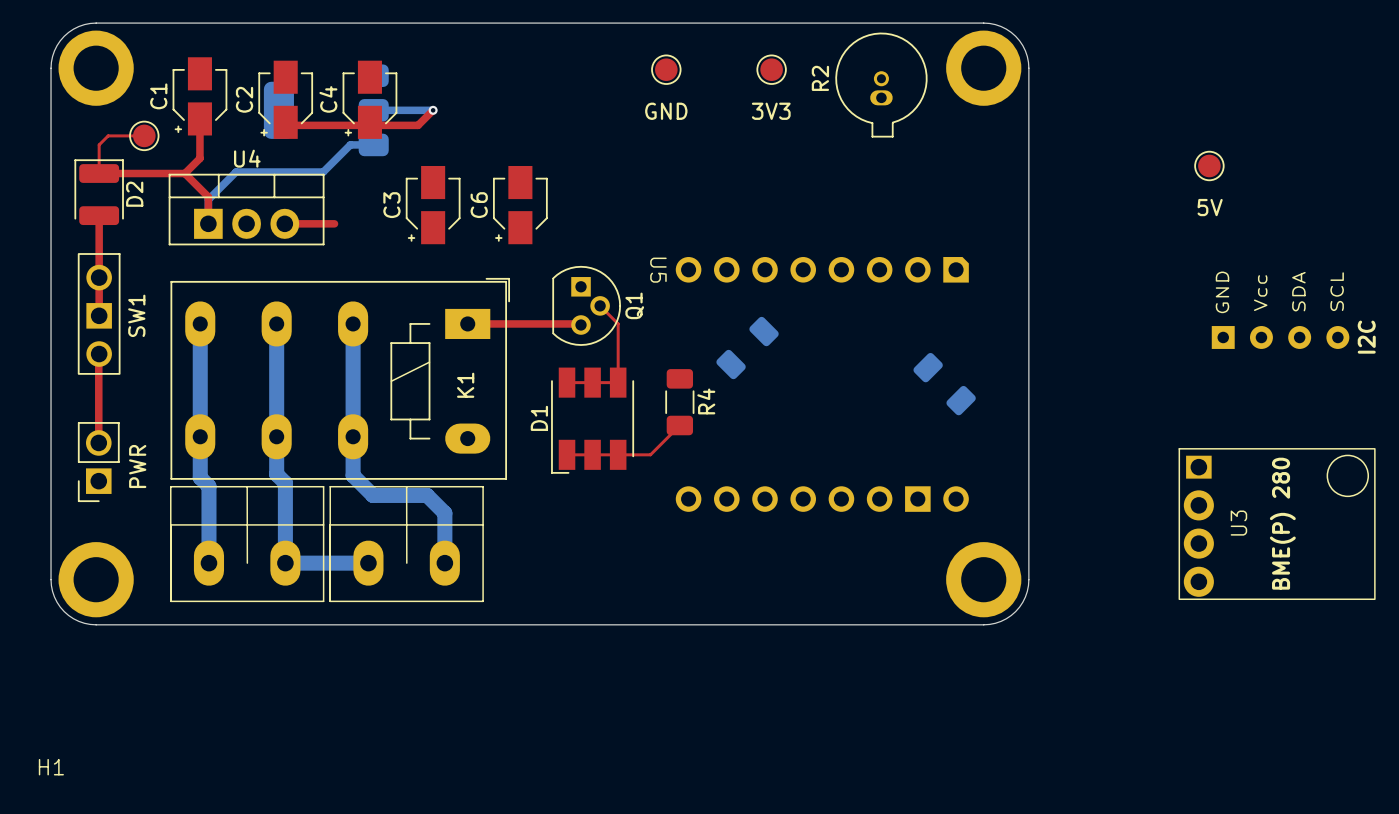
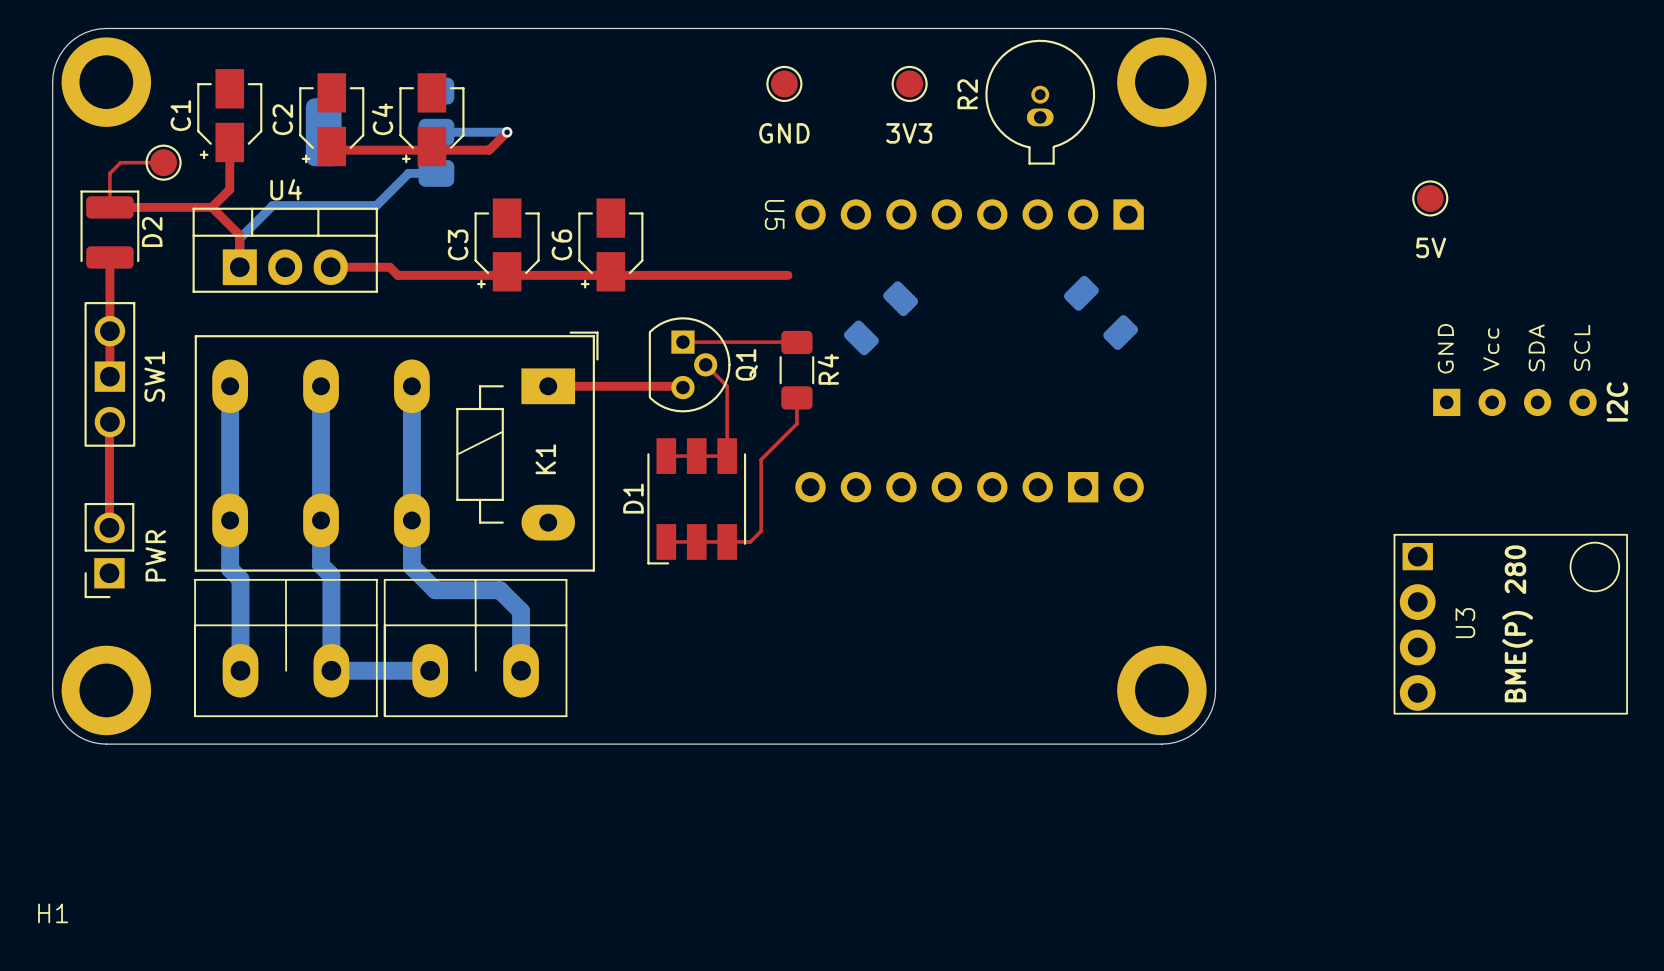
top track: none -> (389, 267) (397, 275) (787, 275)
part: none -> (1101, 312)
top track: none -> (682, 342) (796, 342)
part position: (747, 348) -> (881, 318)
U5 position: (822, 384) -> (969, 350)
part: (944, 384) -> none
R4 position: (679, 402) -> (796, 370)
top track: (679, 425) (650, 454) (637, 454) -> (796, 397) (796, 423) (761, 459) (761, 531) (750, 541)

